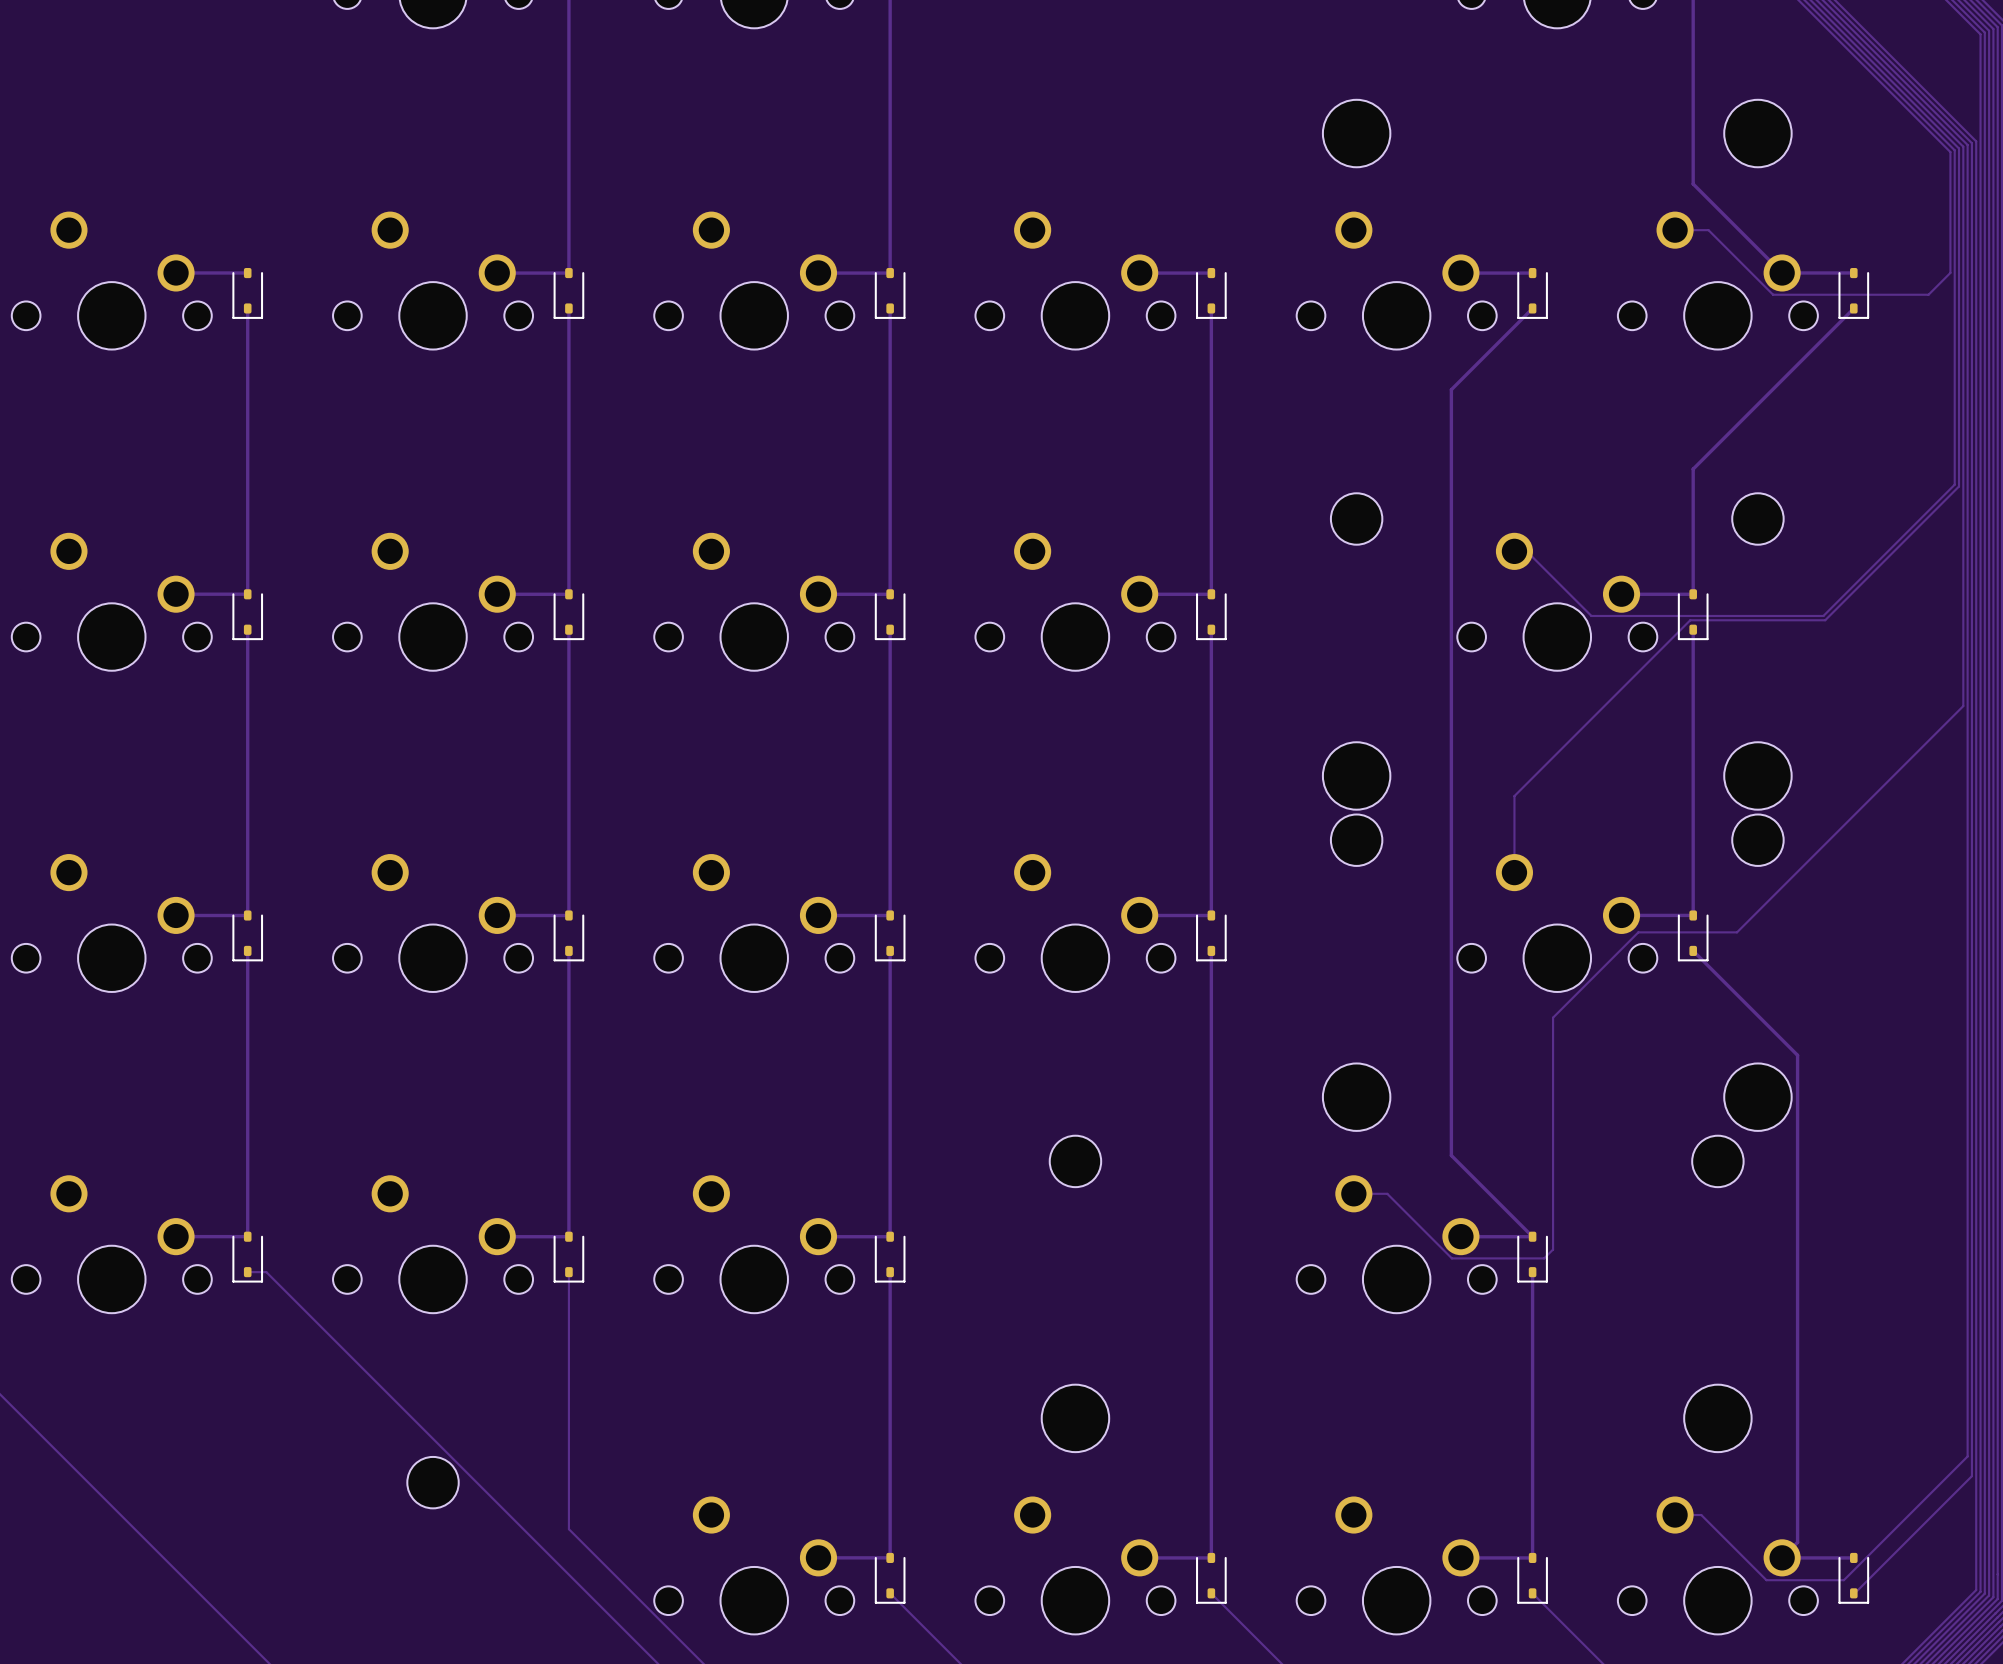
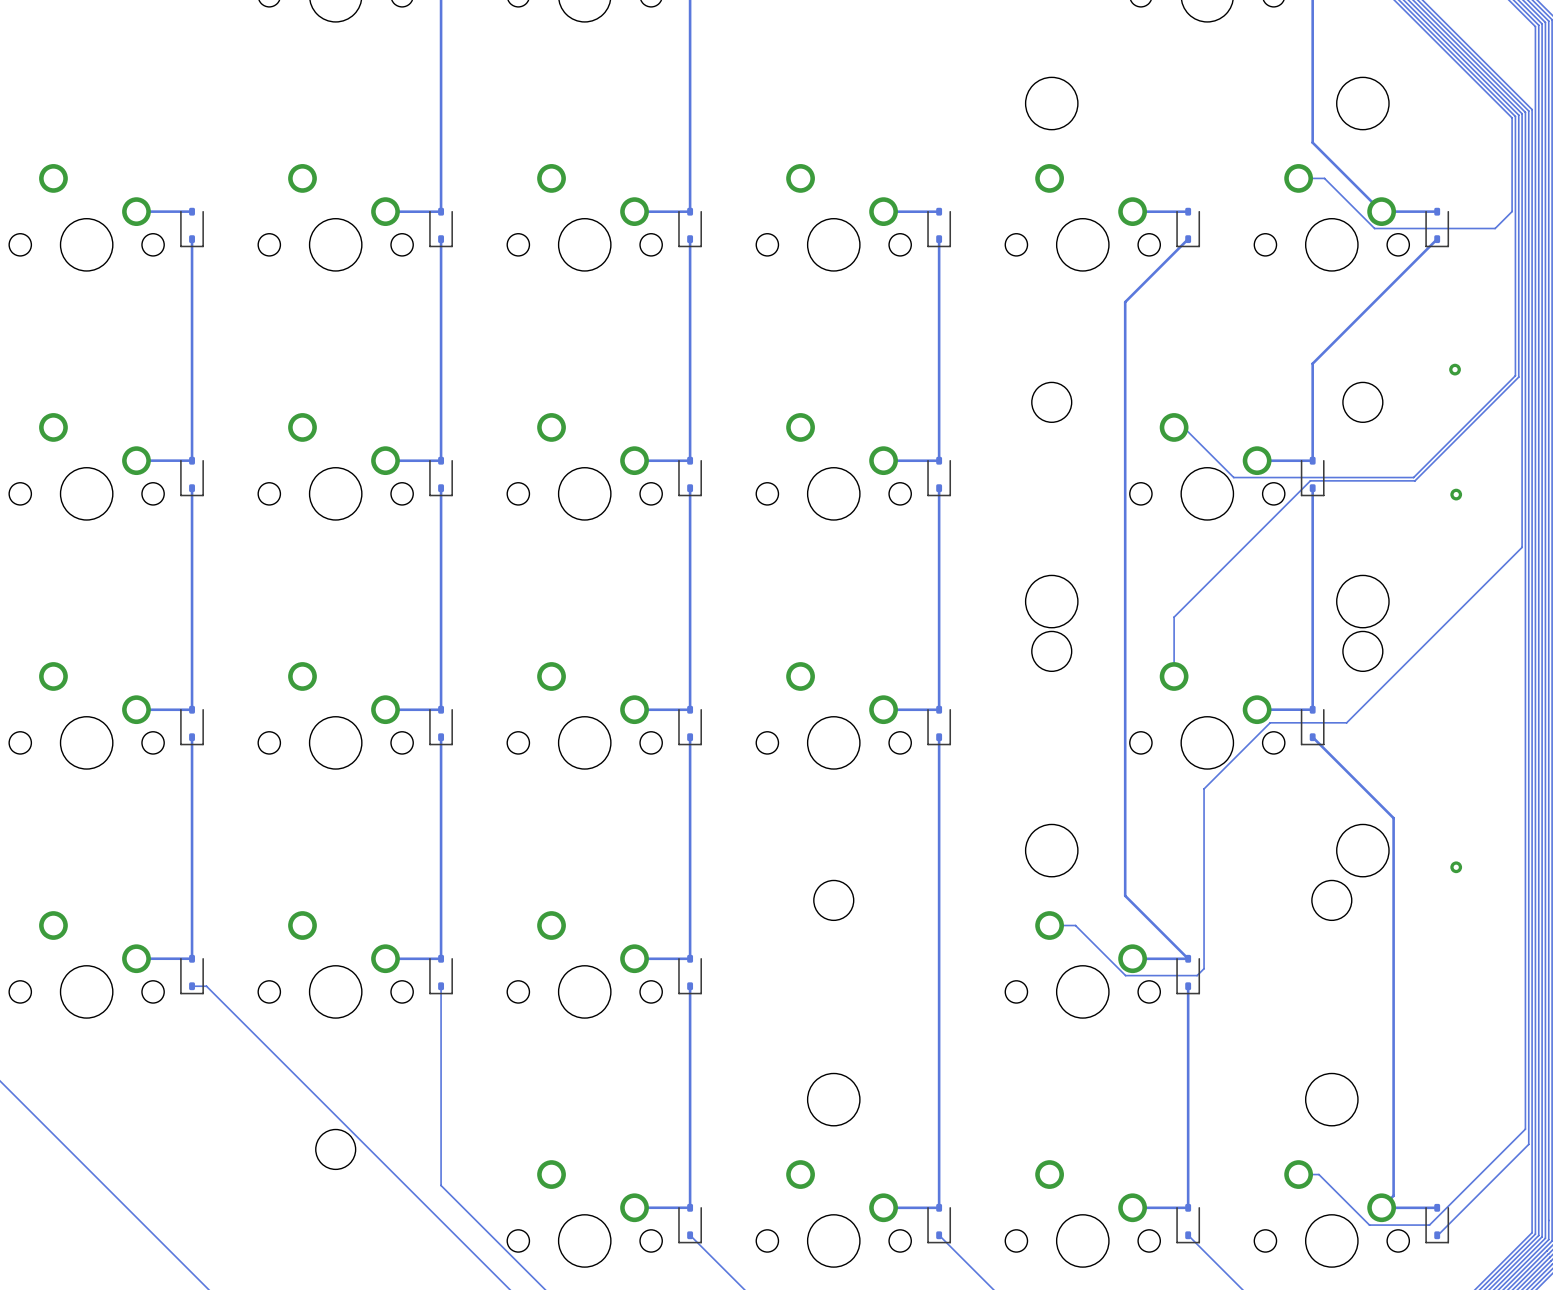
via: none -> (1455, 369)
via: none -> (1456, 494)
via: none -> (1456, 867)

